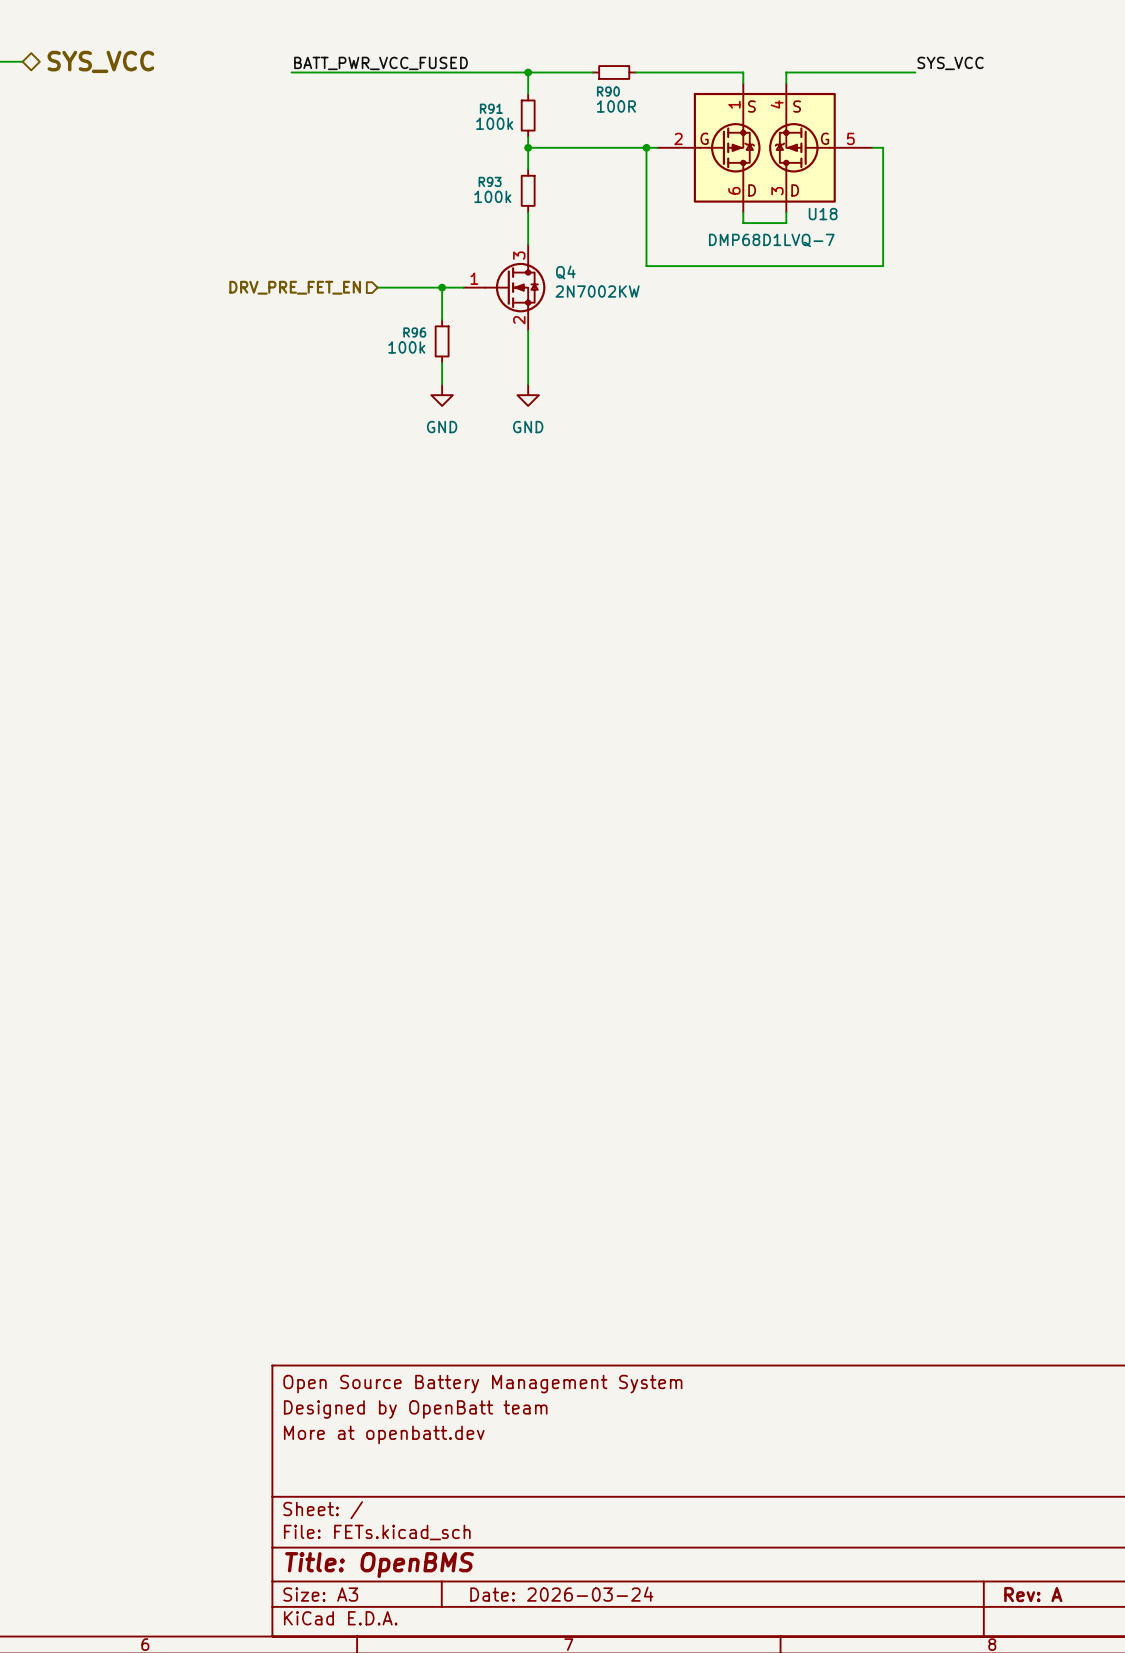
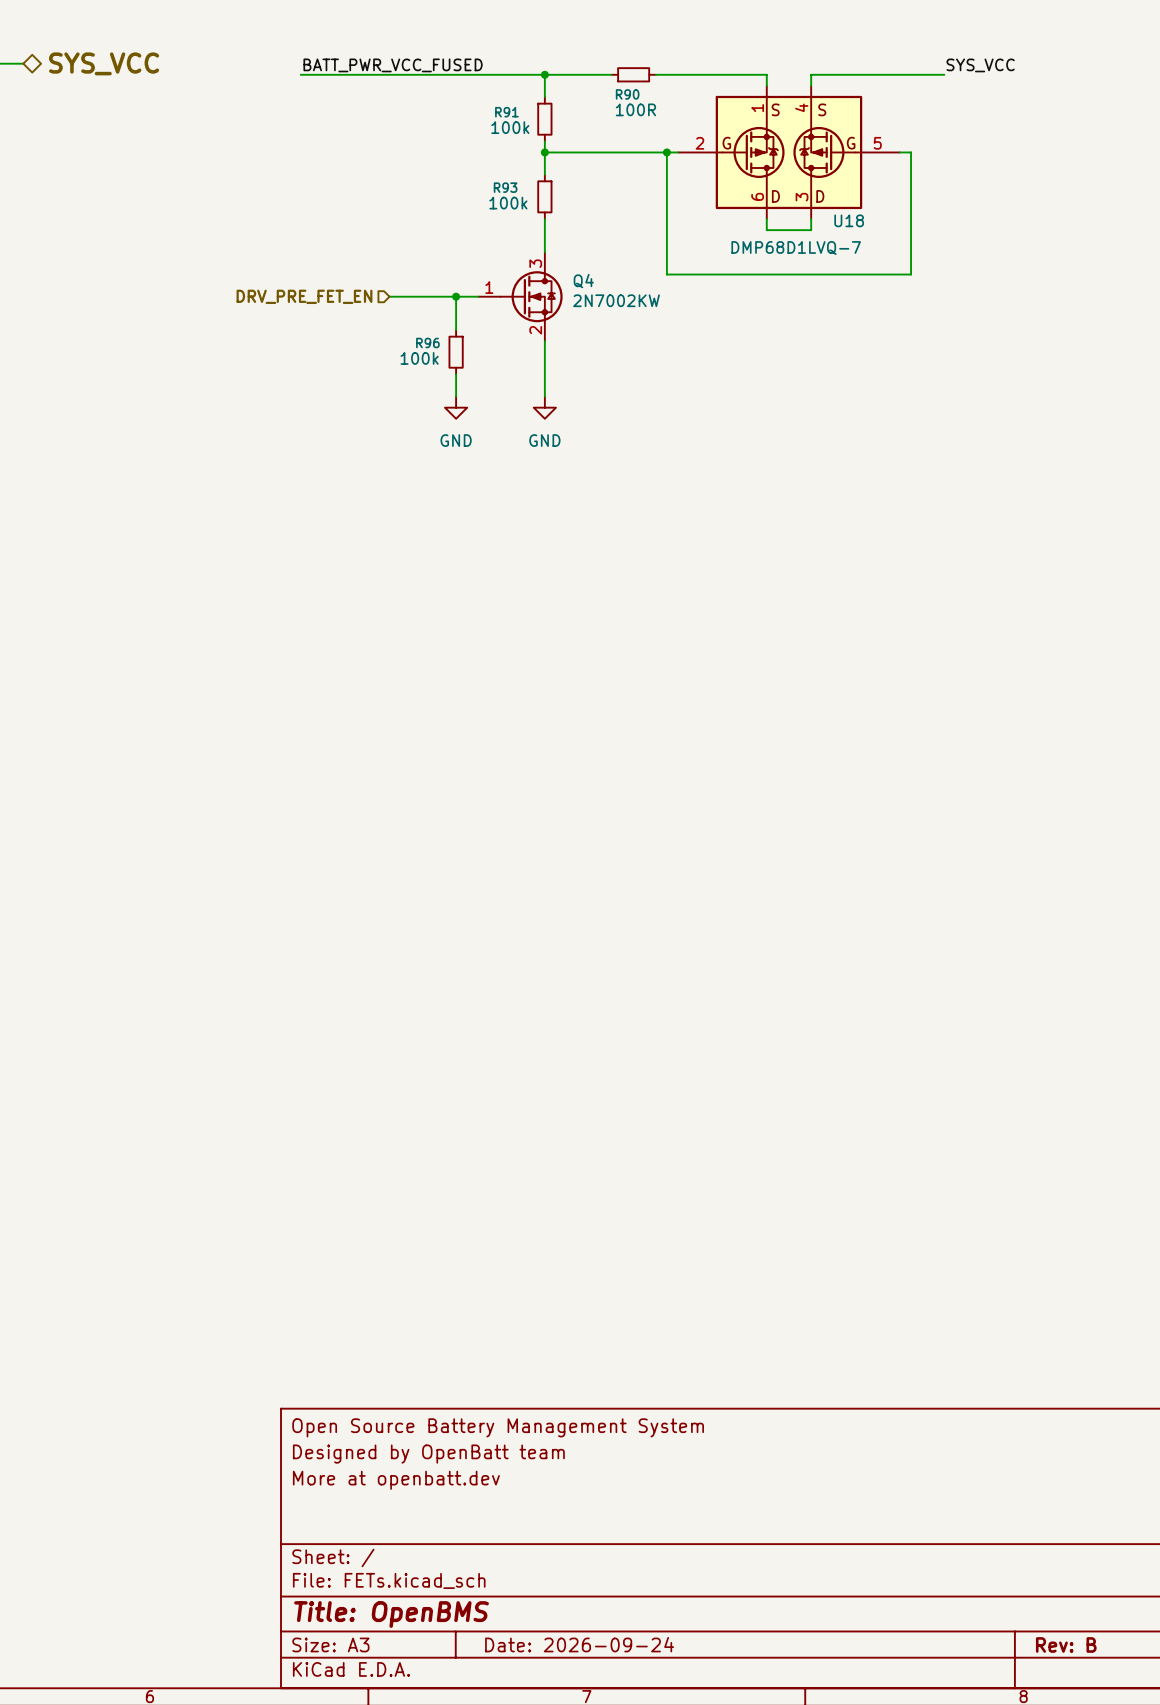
title block: Date: 2026-03-24 (561, 1594) -> Date: 2026-09-24 (579, 1644)
title block: Rev: A (1033, 1594) -> Rev: B (1066, 1644)

